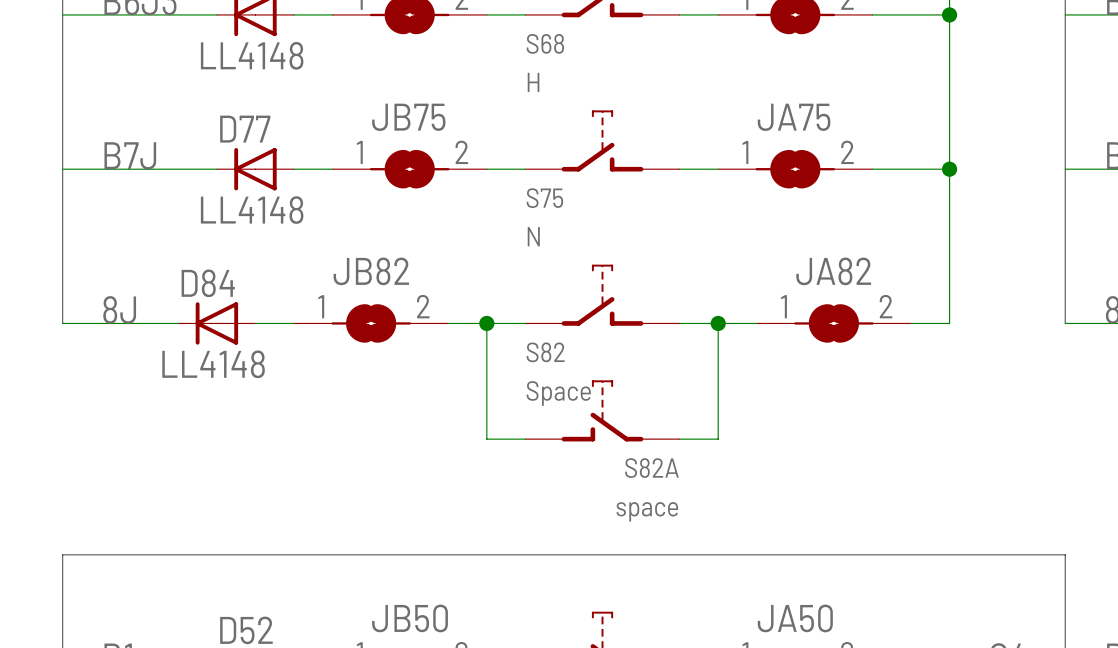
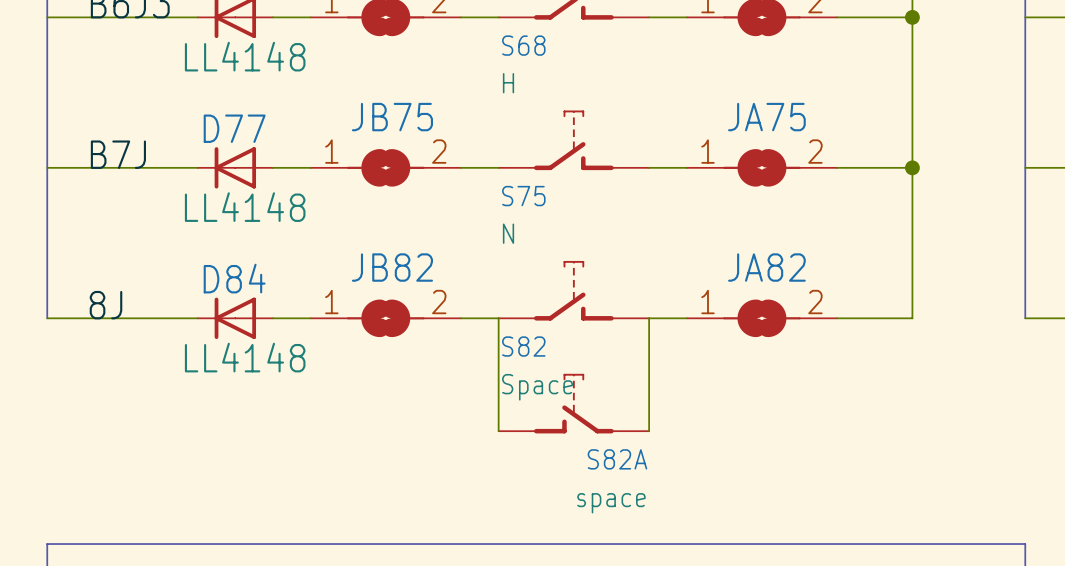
D84 position: (216, 323) -> (235, 318)
JB82 position: (371, 323) -> (385, 318)
wire: (448, 323) (486, 323) (486, 439) (525, 439) -> (498, 318) (498, 431)
junction: (486, 323) -> none
junction: (718, 323) -> none
wire: (756, 323) (718, 323) (718, 439) (679, 439) -> (649, 318) (649, 431)
JA82 position: (833, 323) -> (761, 318)

